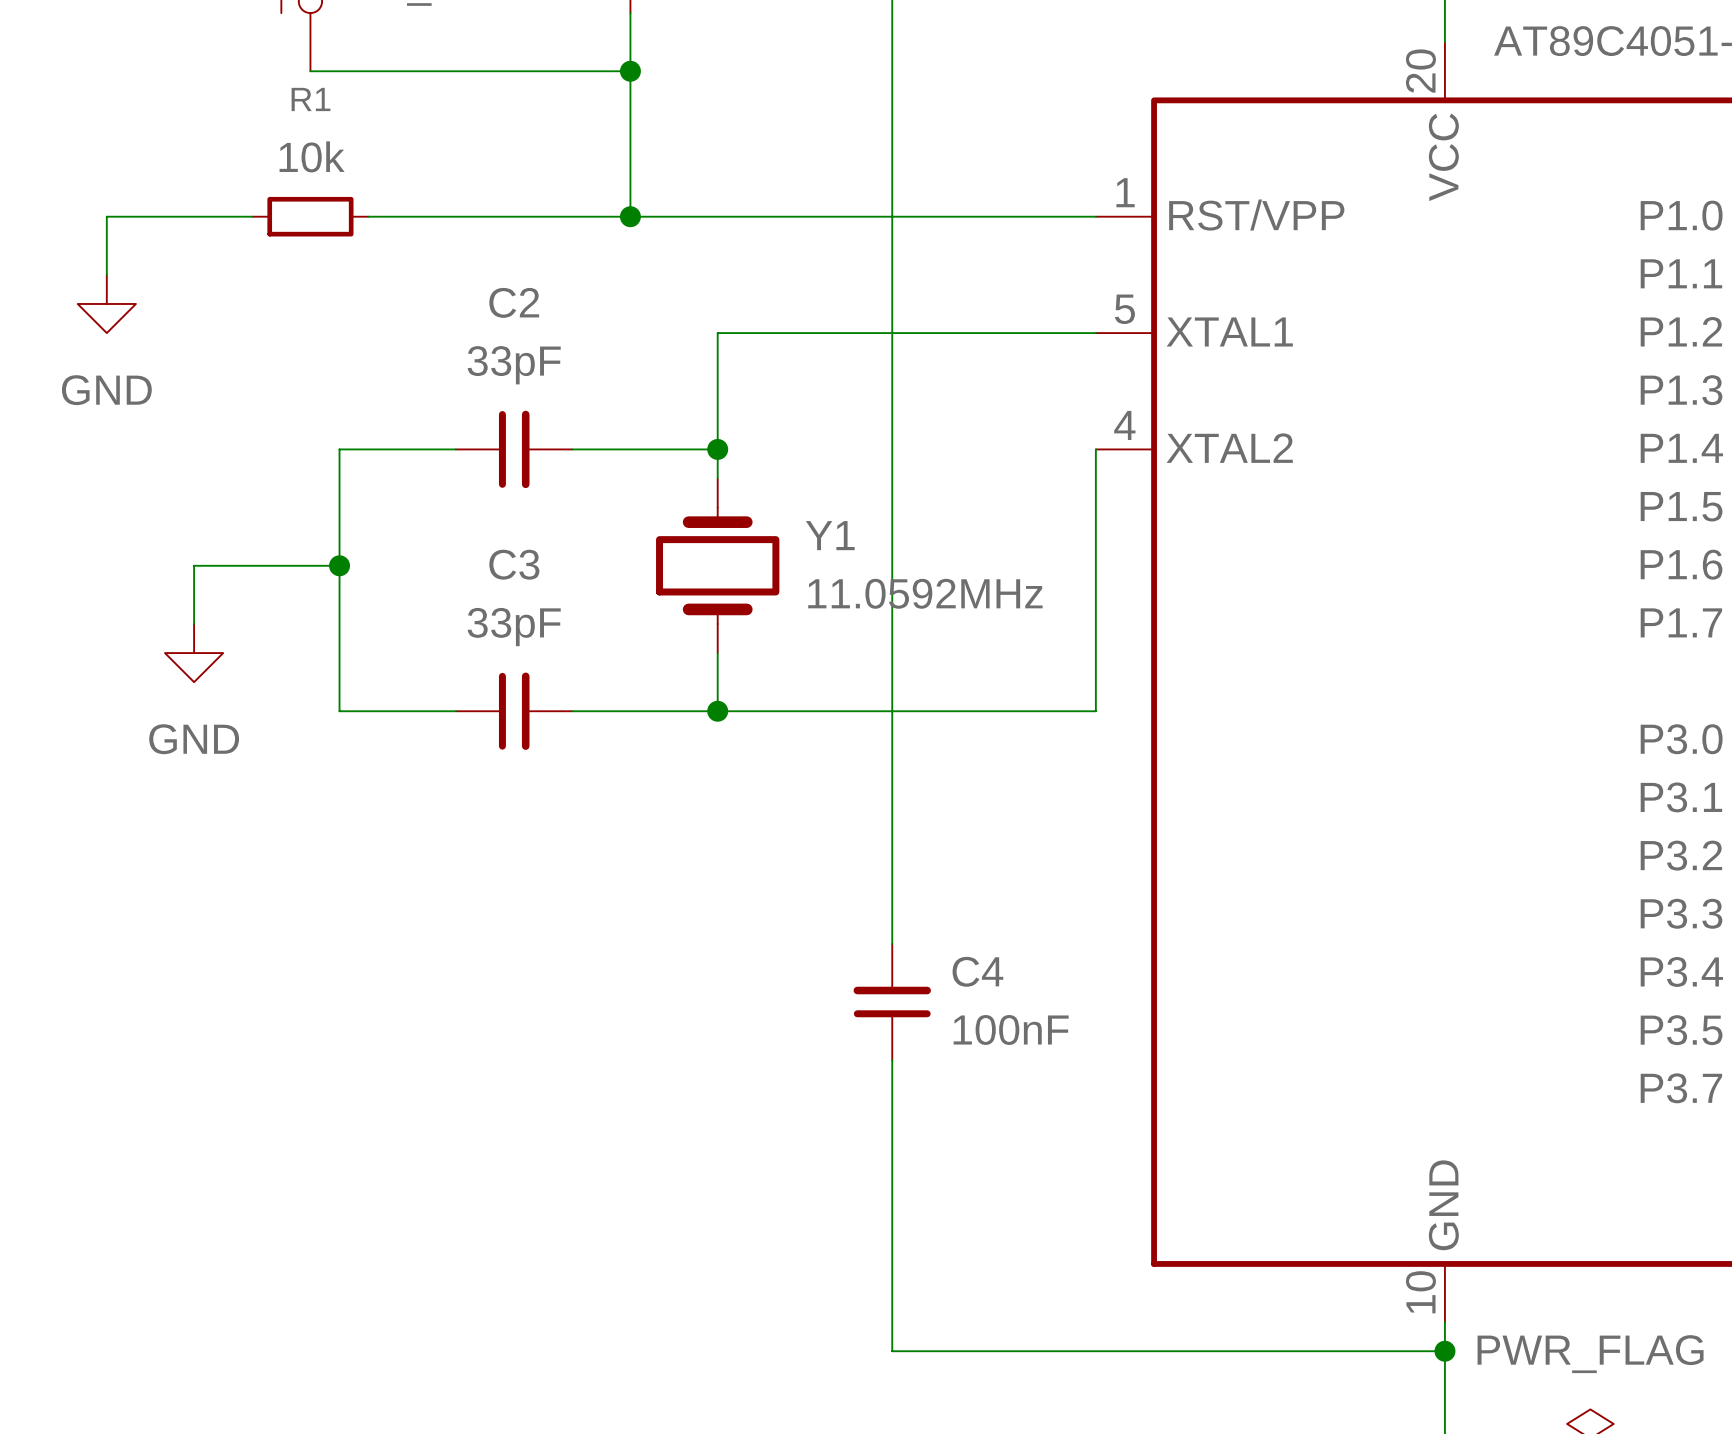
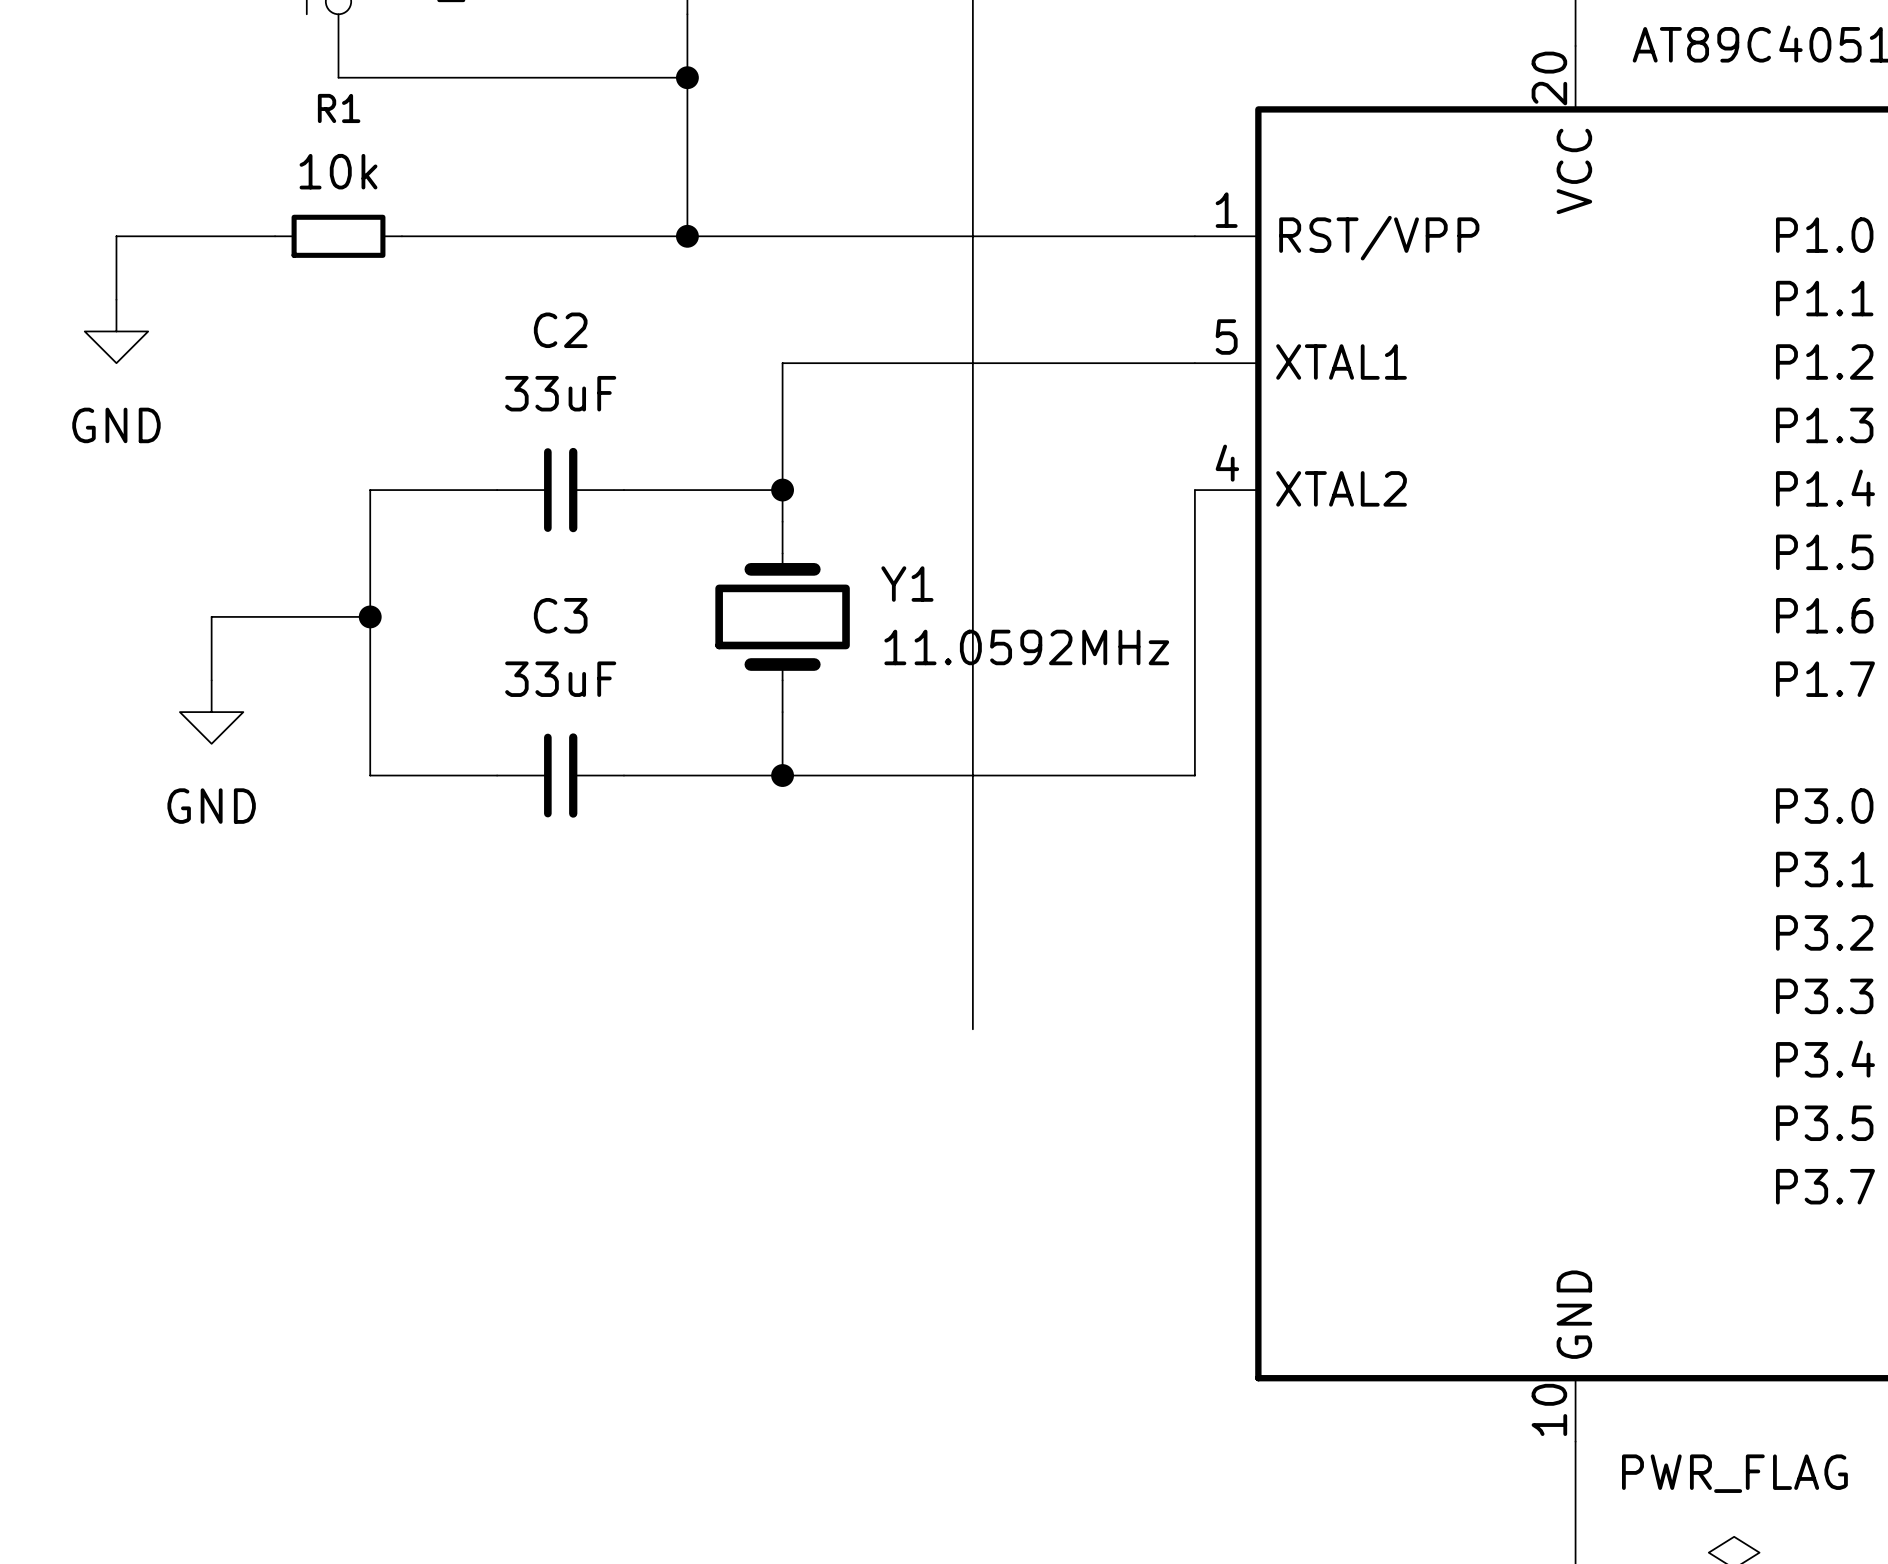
C2 value: 33pF (514, 365) -> 33uF (560, 393)
C3 value: 33pF (514, 627) -> 33uF (560, 679)
C4: 100nF (892, 1002) -> none
wire: (892, 1060) (892, 1351) (1444, 1351) -> none
junction: (1444, 1351) -> none

